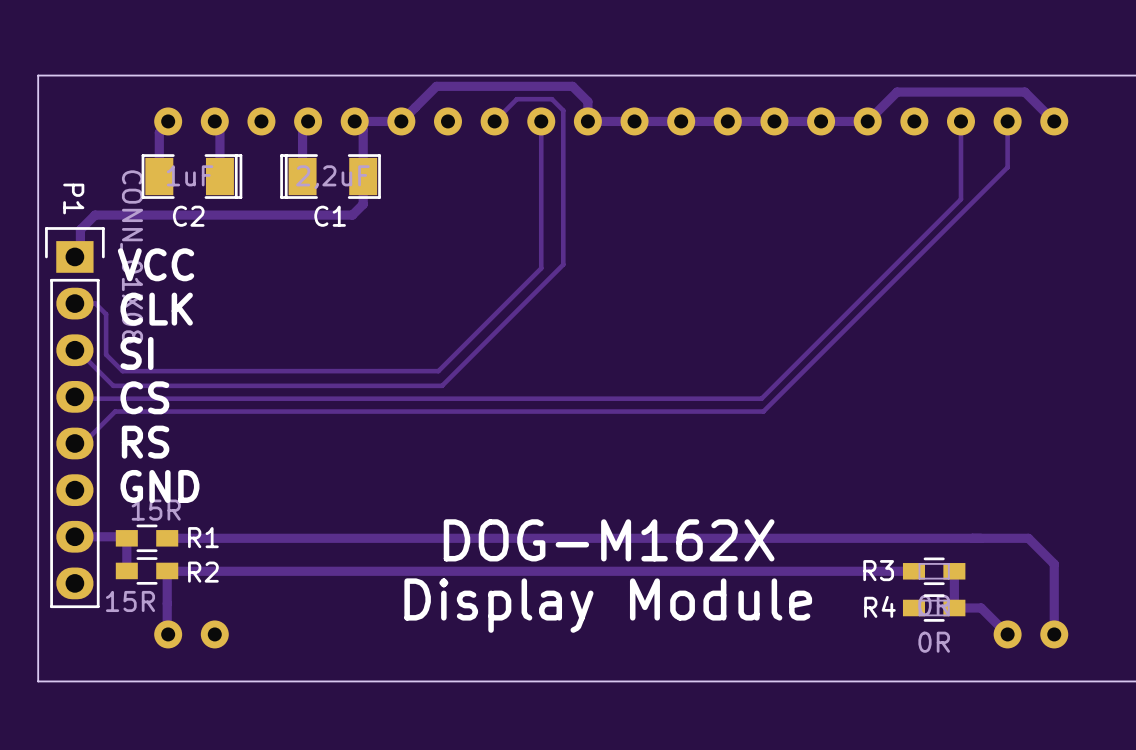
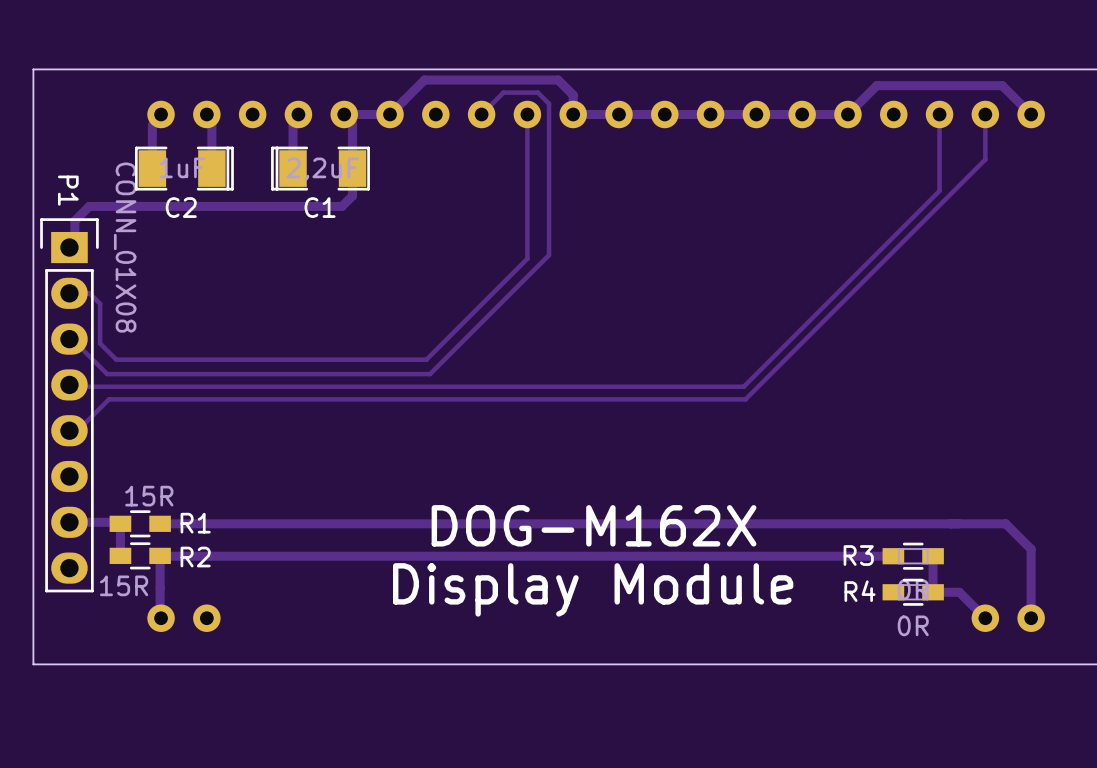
text: VCC (156, 264) -> none
text: CLK (156, 309) -> none
text: SI (137, 353) -> none
text: CS (144, 397) -> none
text: RS (145, 442) -> none
text: GND (159, 486) -> none

